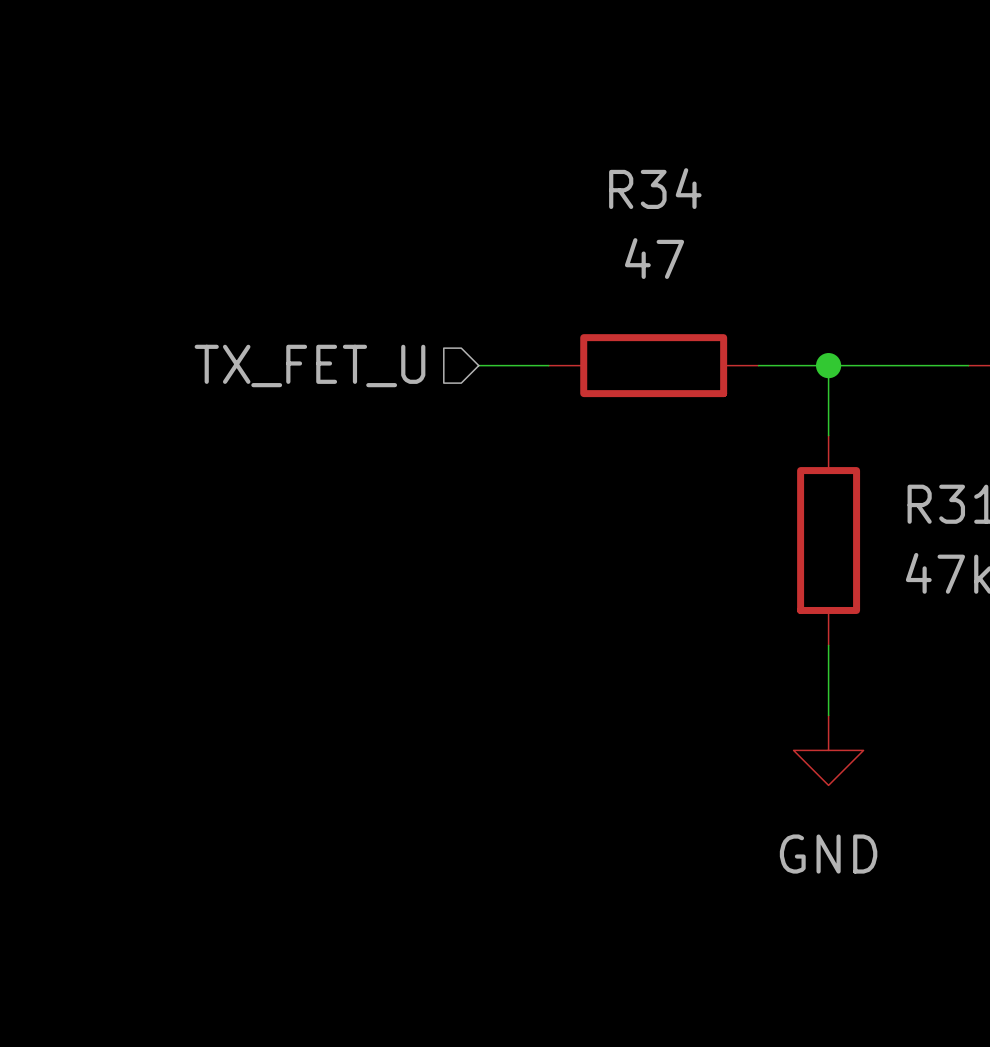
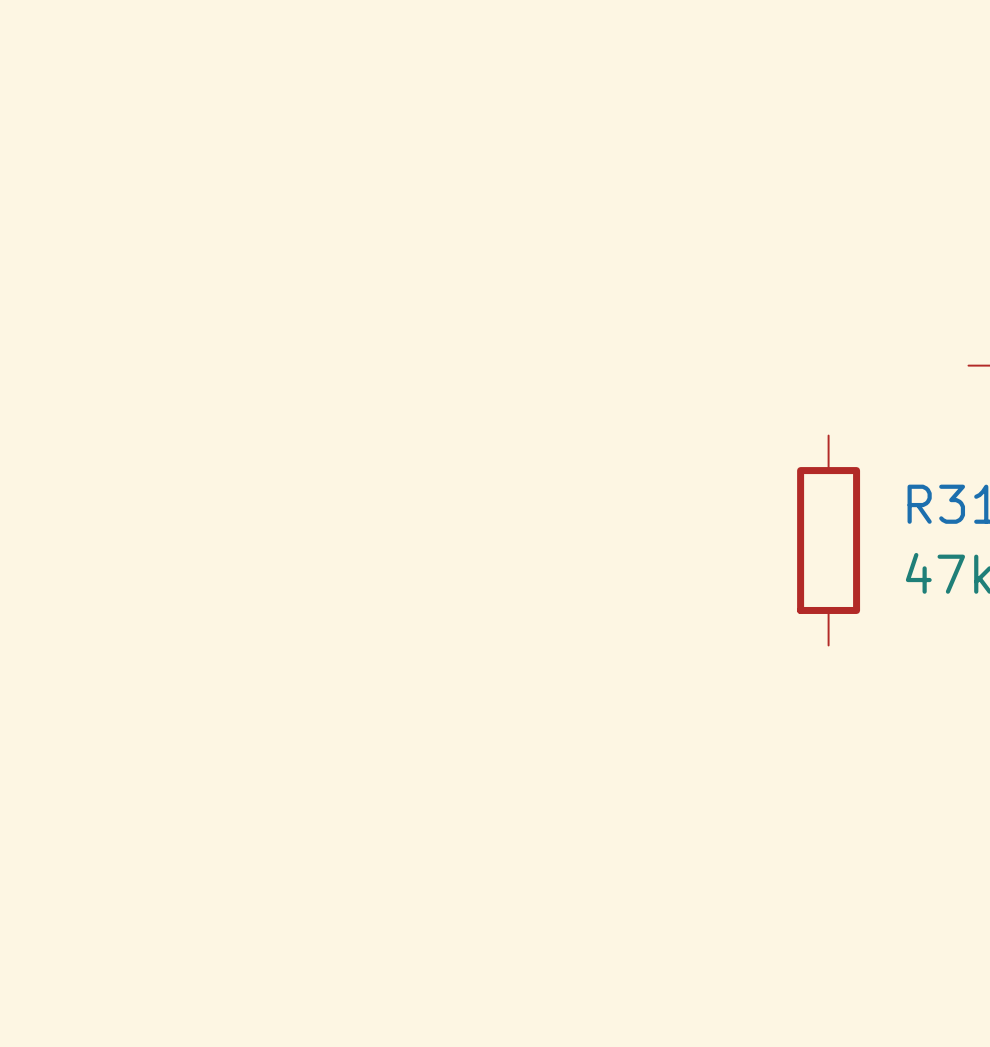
hierarchical label: TX_FET_U (310, 365) -> none
wire: (478, 365) (548, 365) -> none
R34: 47 (653, 365) -> none
wire: (758, 365) (968, 365) -> none
wire: (828, 365) (828, 435) -> none
junction: (828, 365) -> none
wire: (828, 645) (828, 715) -> none
power symbol: GND (828, 750) -> none

